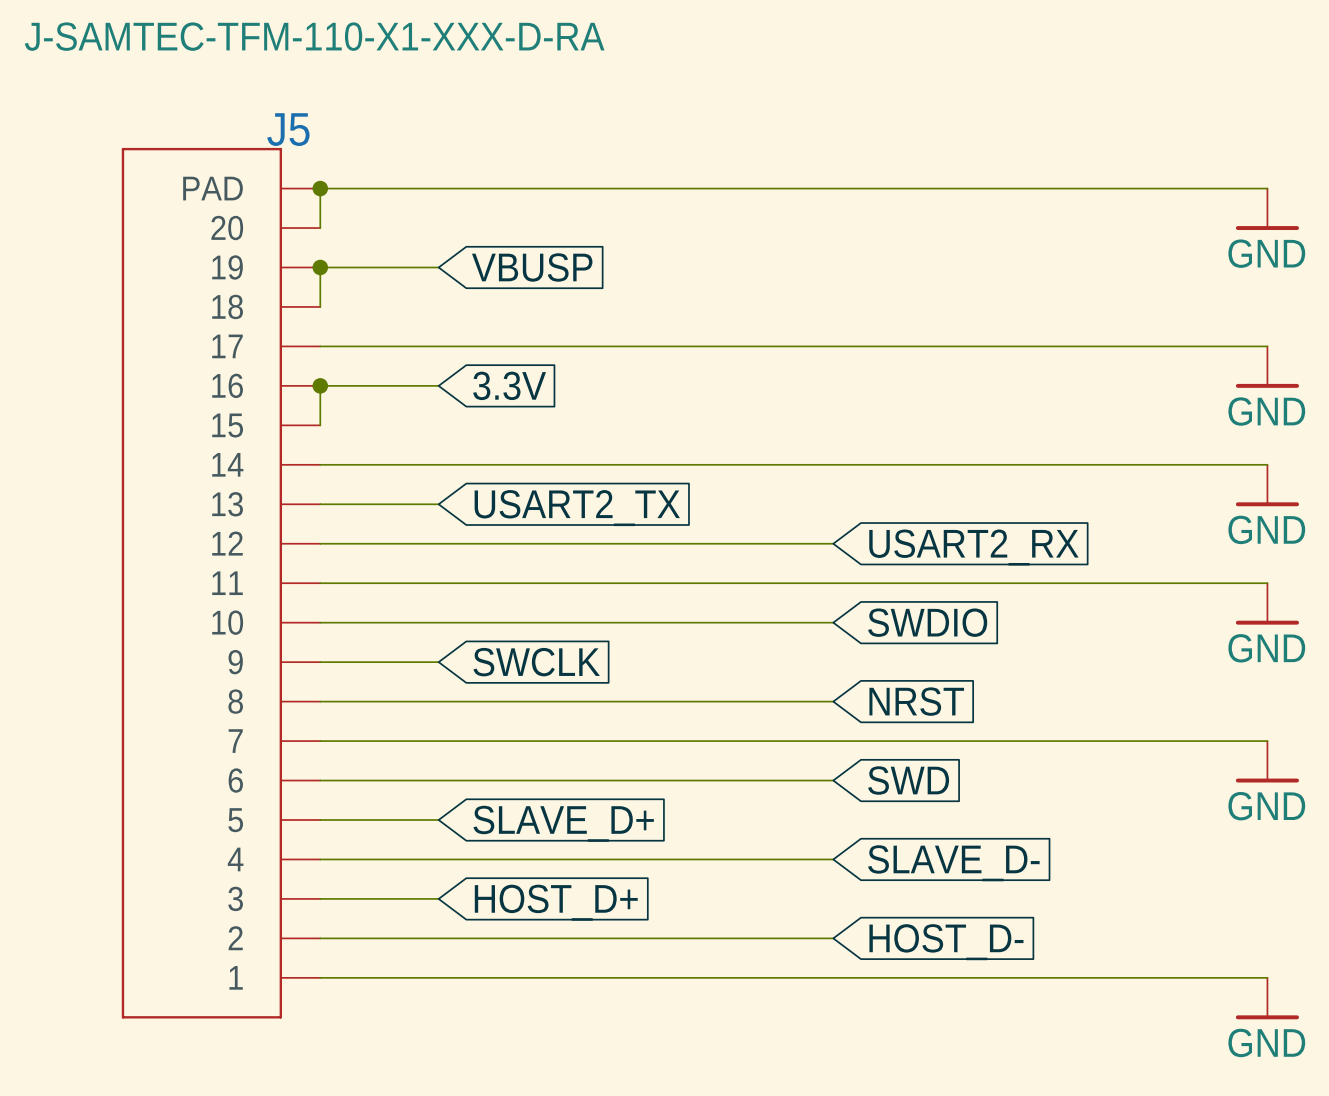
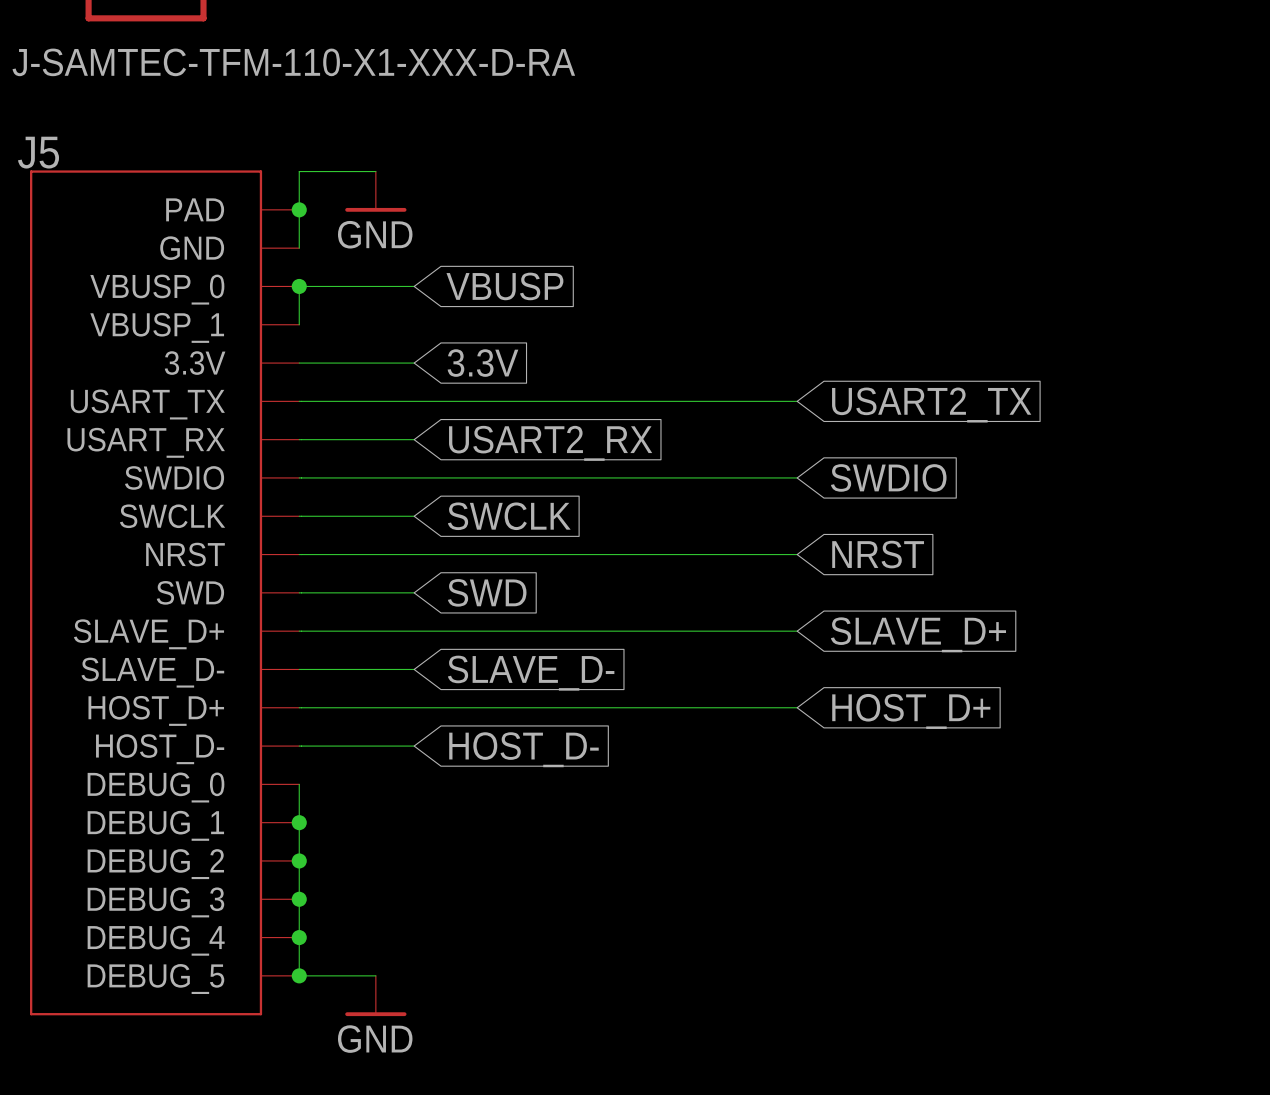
J5 name position: J5 (288, 129) -> J5 (38, 152)
J5 symbol: [121, 147, 321, 1019] -> [30, 170, 300, 1016]
power symbol: none -> GND (375, 191)
wire: (320, 188) (1267, 188) -> (299, 209) (299, 171) (375, 171)
power symbol: GND (1267, 209) -> none
wire: (438, 346) (1267, 346) -> none
power symbol: GND (1267, 367) -> none
wire: (320, 385) (320, 425) -> (414, 439) (299, 439)
junction: (320, 385) -> none
wire: none -> (414, 401) (797, 401)
global label position: 3.3V (509, 385) -> 3.3V (483, 363)
global label: none -> USART2_TX (931, 405)
global label: none -> USART2_RX (550, 443)
wire: (833, 464) (1267, 464) -> none
global label: none -> SWDIO (888, 477)
power symbol: GND (1267, 485) -> none
global label: USART2_TX (577, 508) -> SWCLK (509, 516)
global label: USART2_RX (973, 547) -> NRST (878, 554)
wire: (438, 583) (1267, 583) -> none
global label: none -> SWD (487, 592)
power symbol: GND (1267, 603) -> none
global label: SWDIO (927, 622) -> SLAVE_D+ (918, 634)
global label: SWCLK (536, 662) -> SLAVE_D- (531, 673)
global label: NRST (916, 701) -> HOST_D+ (911, 711)
wire: (438, 741) (1267, 741) -> none
global label: none -> HOST_D- (523, 749)
power symbol: GND (1267, 761) -> none
wire: (320, 780) (833, 780) -> (299, 784) (299, 975)
global label: SWD (908, 780) -> none
wire: (320, 820) (438, 820) -> none
junction: none -> (299, 822)
global label: SLAVE_D+ (563, 823) -> none
wire: (320, 859) (833, 859) -> none
junction: none -> (299, 860)
global label: SLAVE_D- (953, 863) -> none
wire: (320, 898) (438, 898) -> none
junction: none -> (299, 899)
global label: HOST_D+ (556, 902) -> none
wire: (320, 938) (833, 938) -> none
junction: none -> (299, 937)
global label: HOST_D- (946, 942) -> none
junction: none -> (299, 975)
wire: (399, 977) (1267, 977) -> none
power symbol: none -> GND (375, 995)
power symbol: GND (1267, 998) -> none

